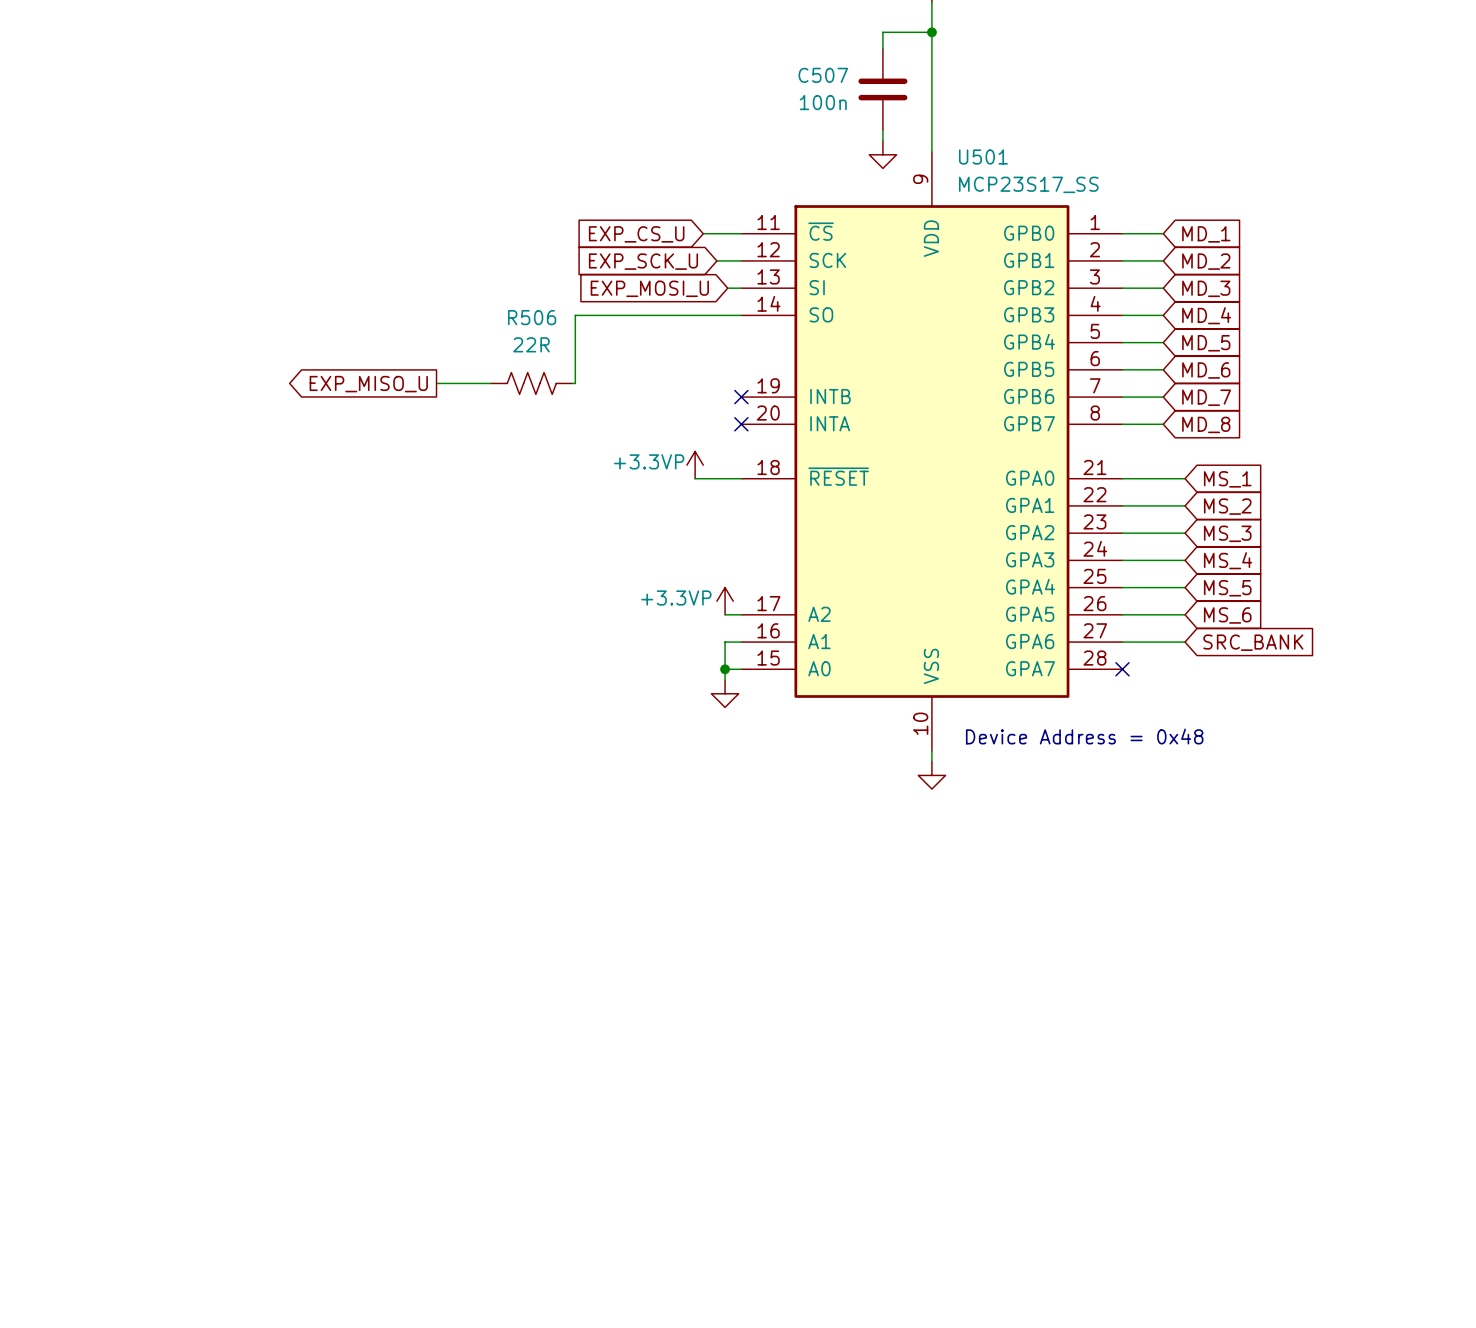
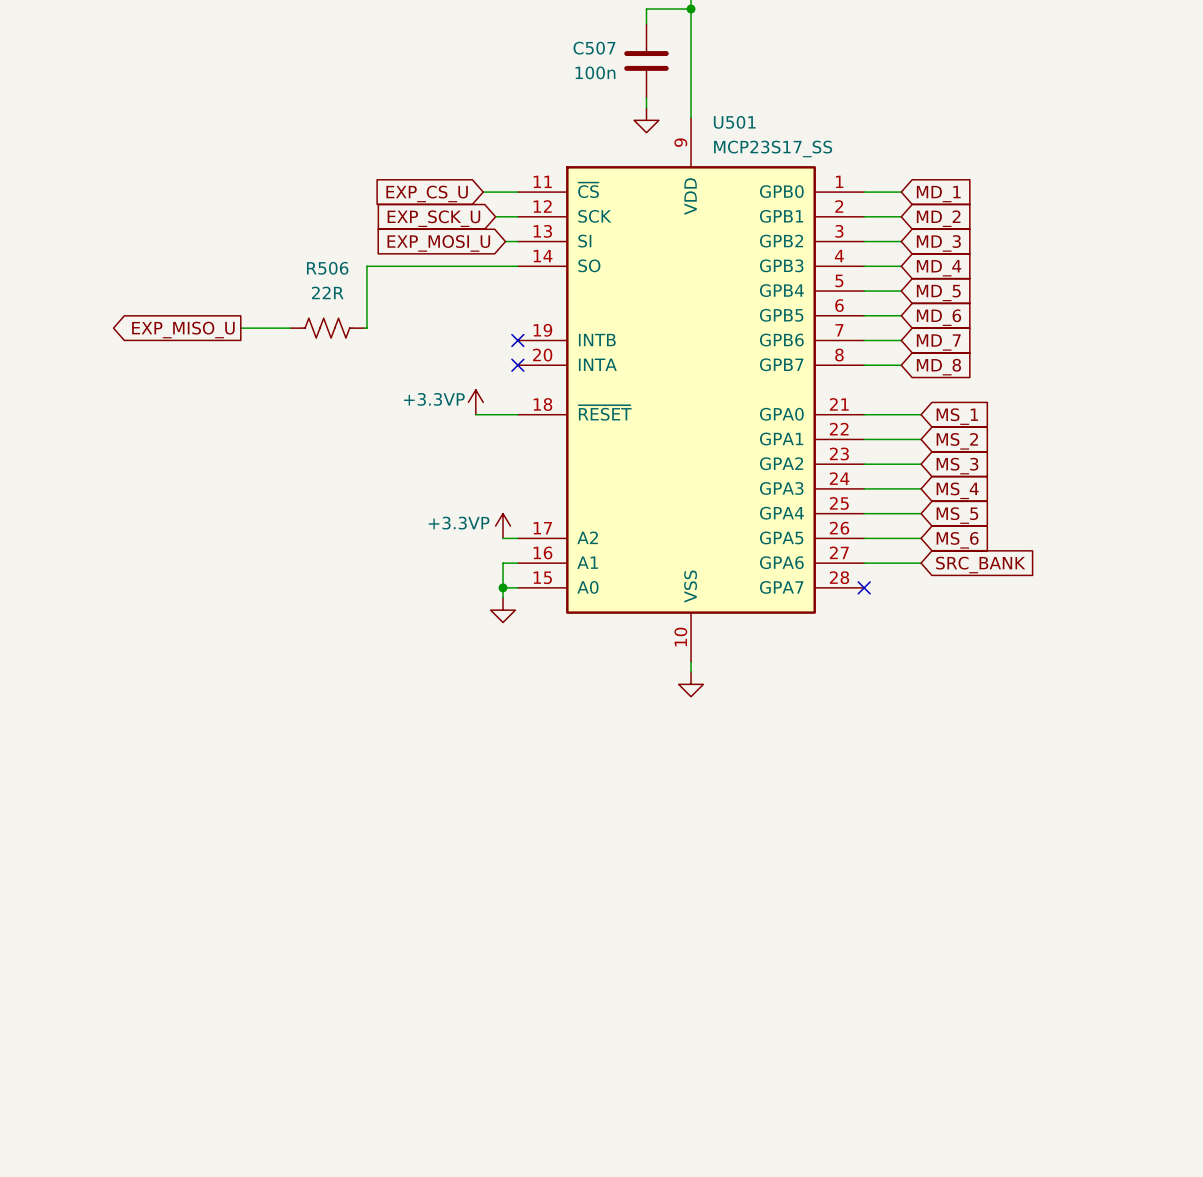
text: Device Address = 0x48 (1084, 736) -> none

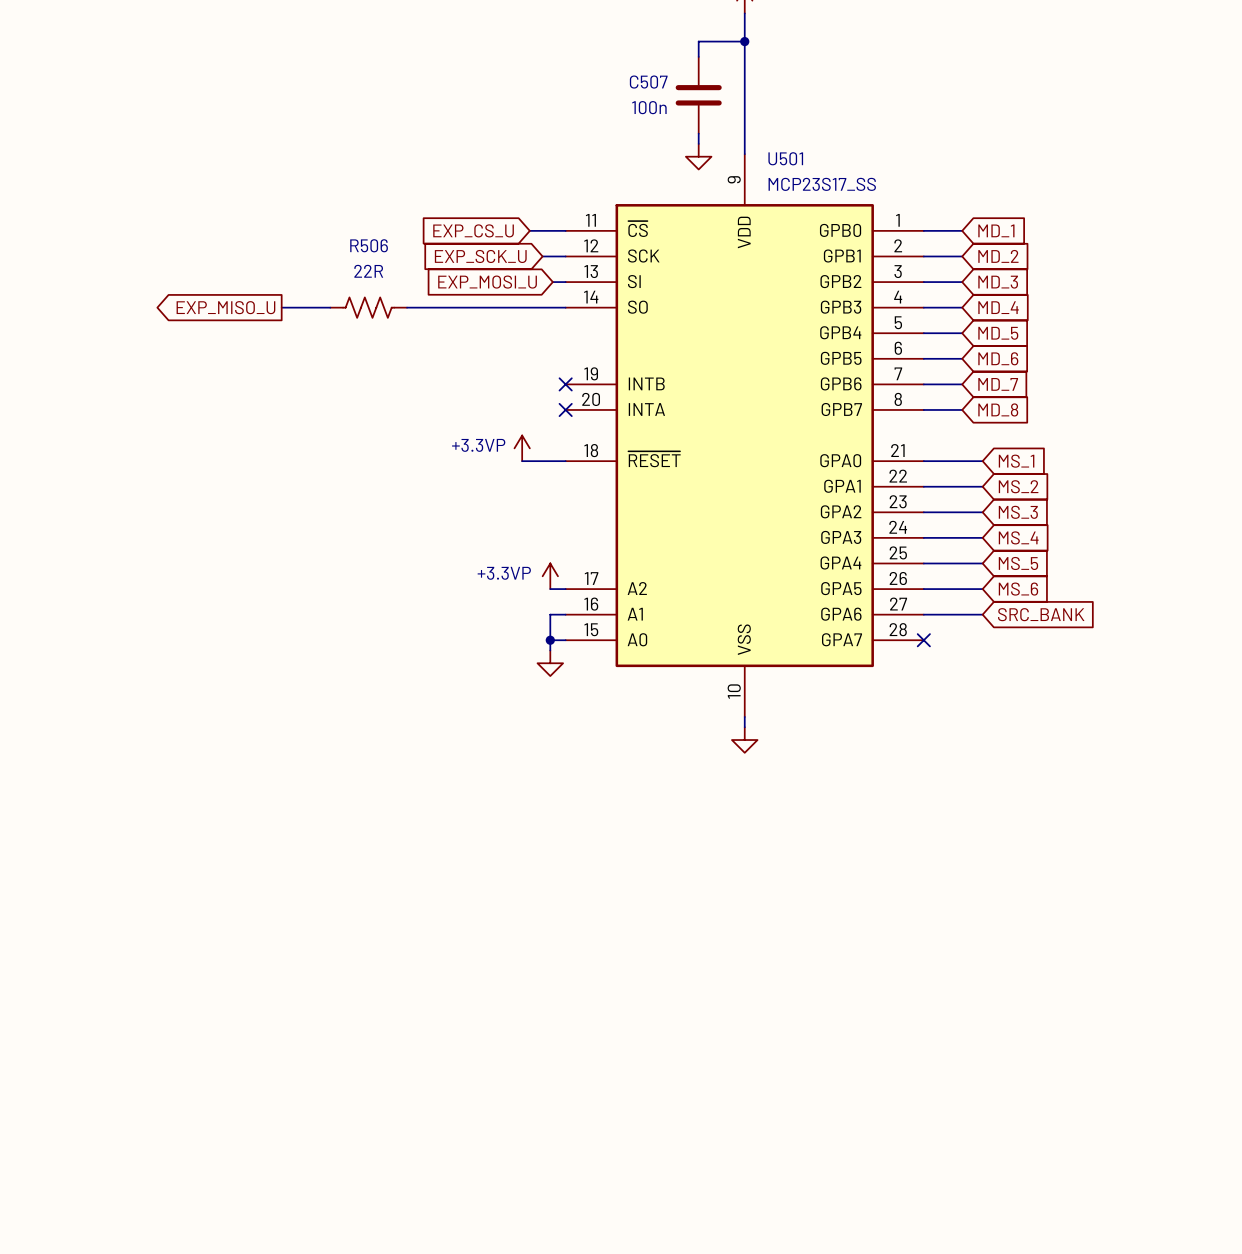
wire: none -> (281, 307) (330, 307)
wire: (366, 266) (366, 328) (364, 328) -> (409, 307) (407, 307)
wire: (240, 328) (290, 328) -> none
R506 position: (327, 328) -> (368, 307)
global label position: EXP_MISO_U (183, 330) -> EXP_MISO_U (225, 307)

